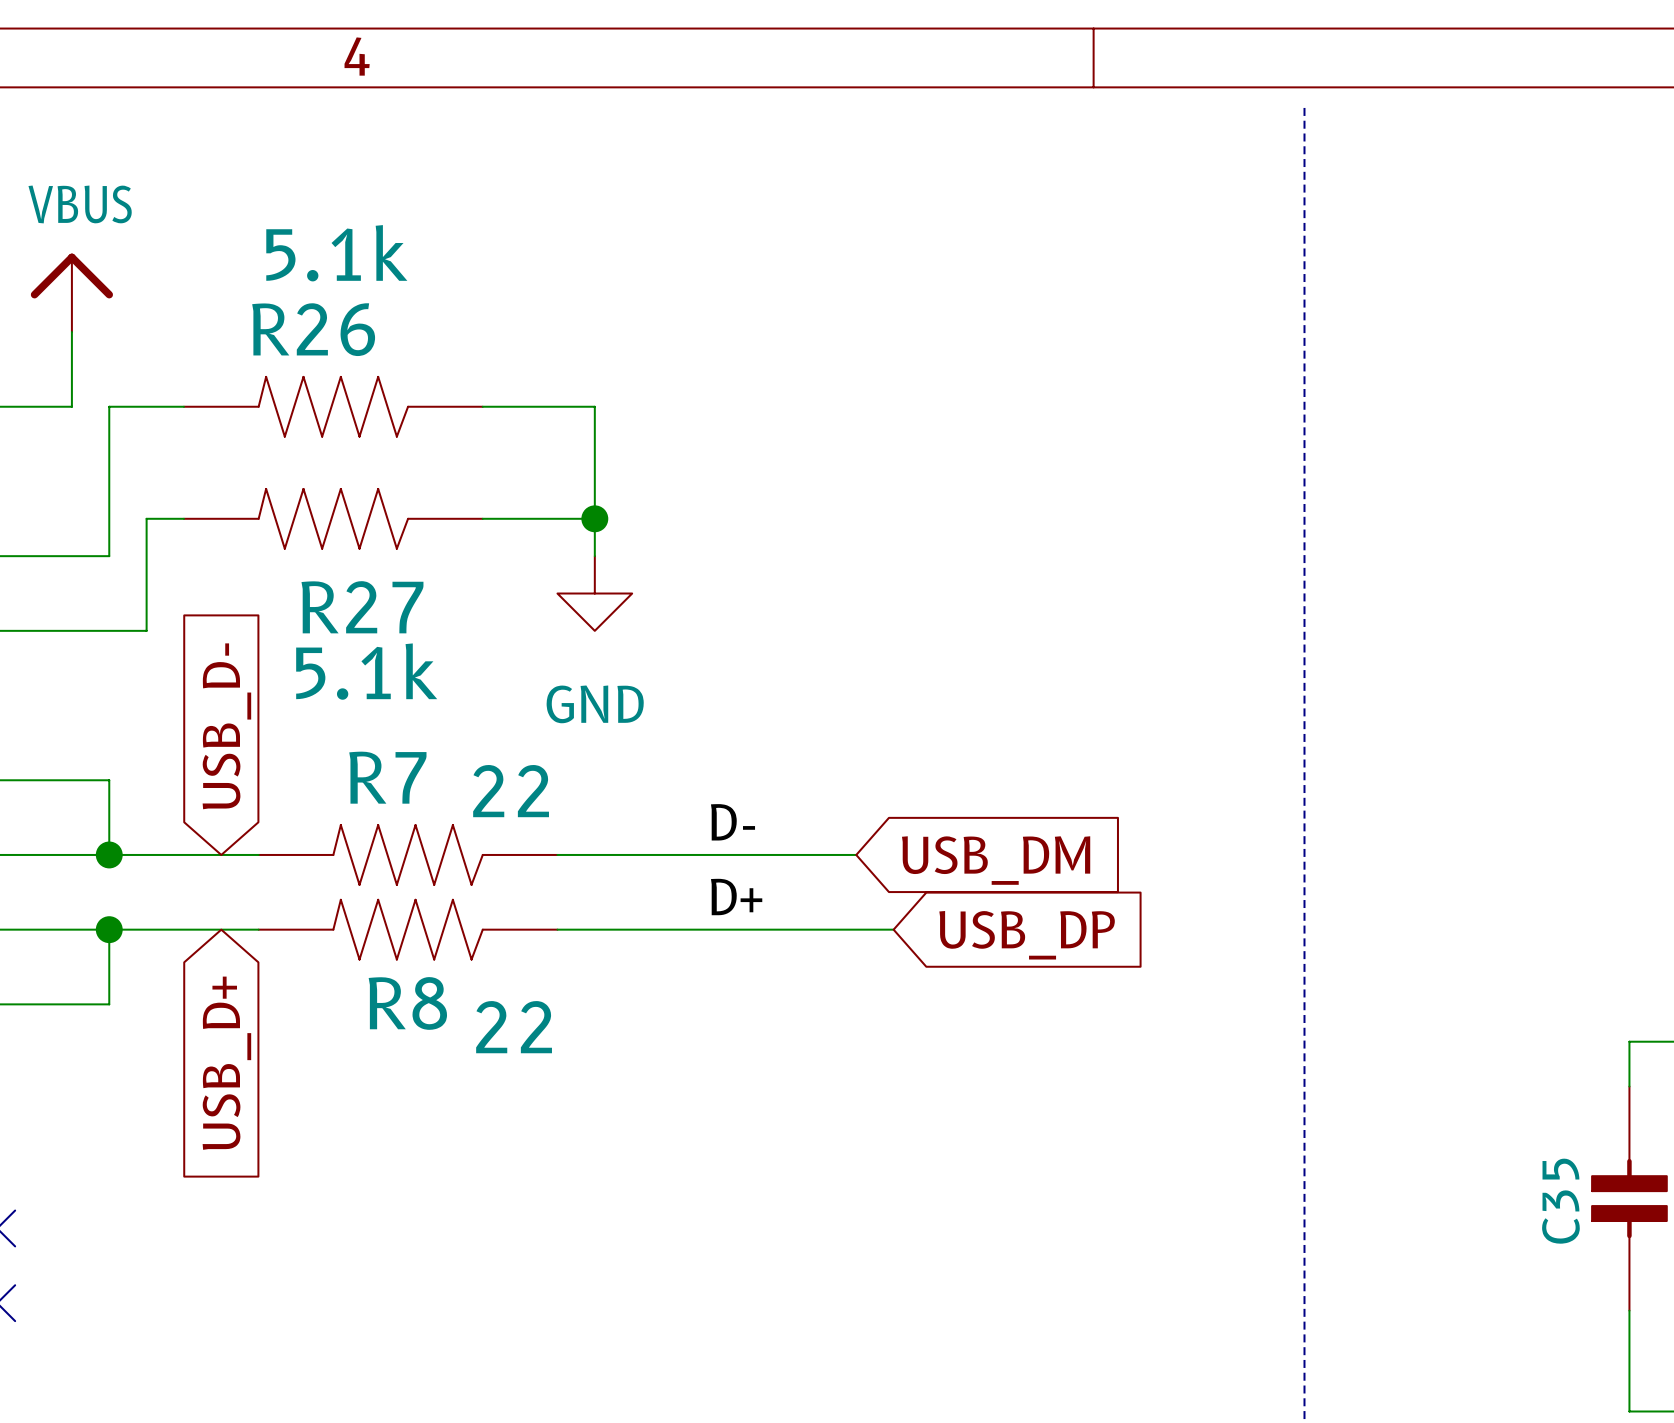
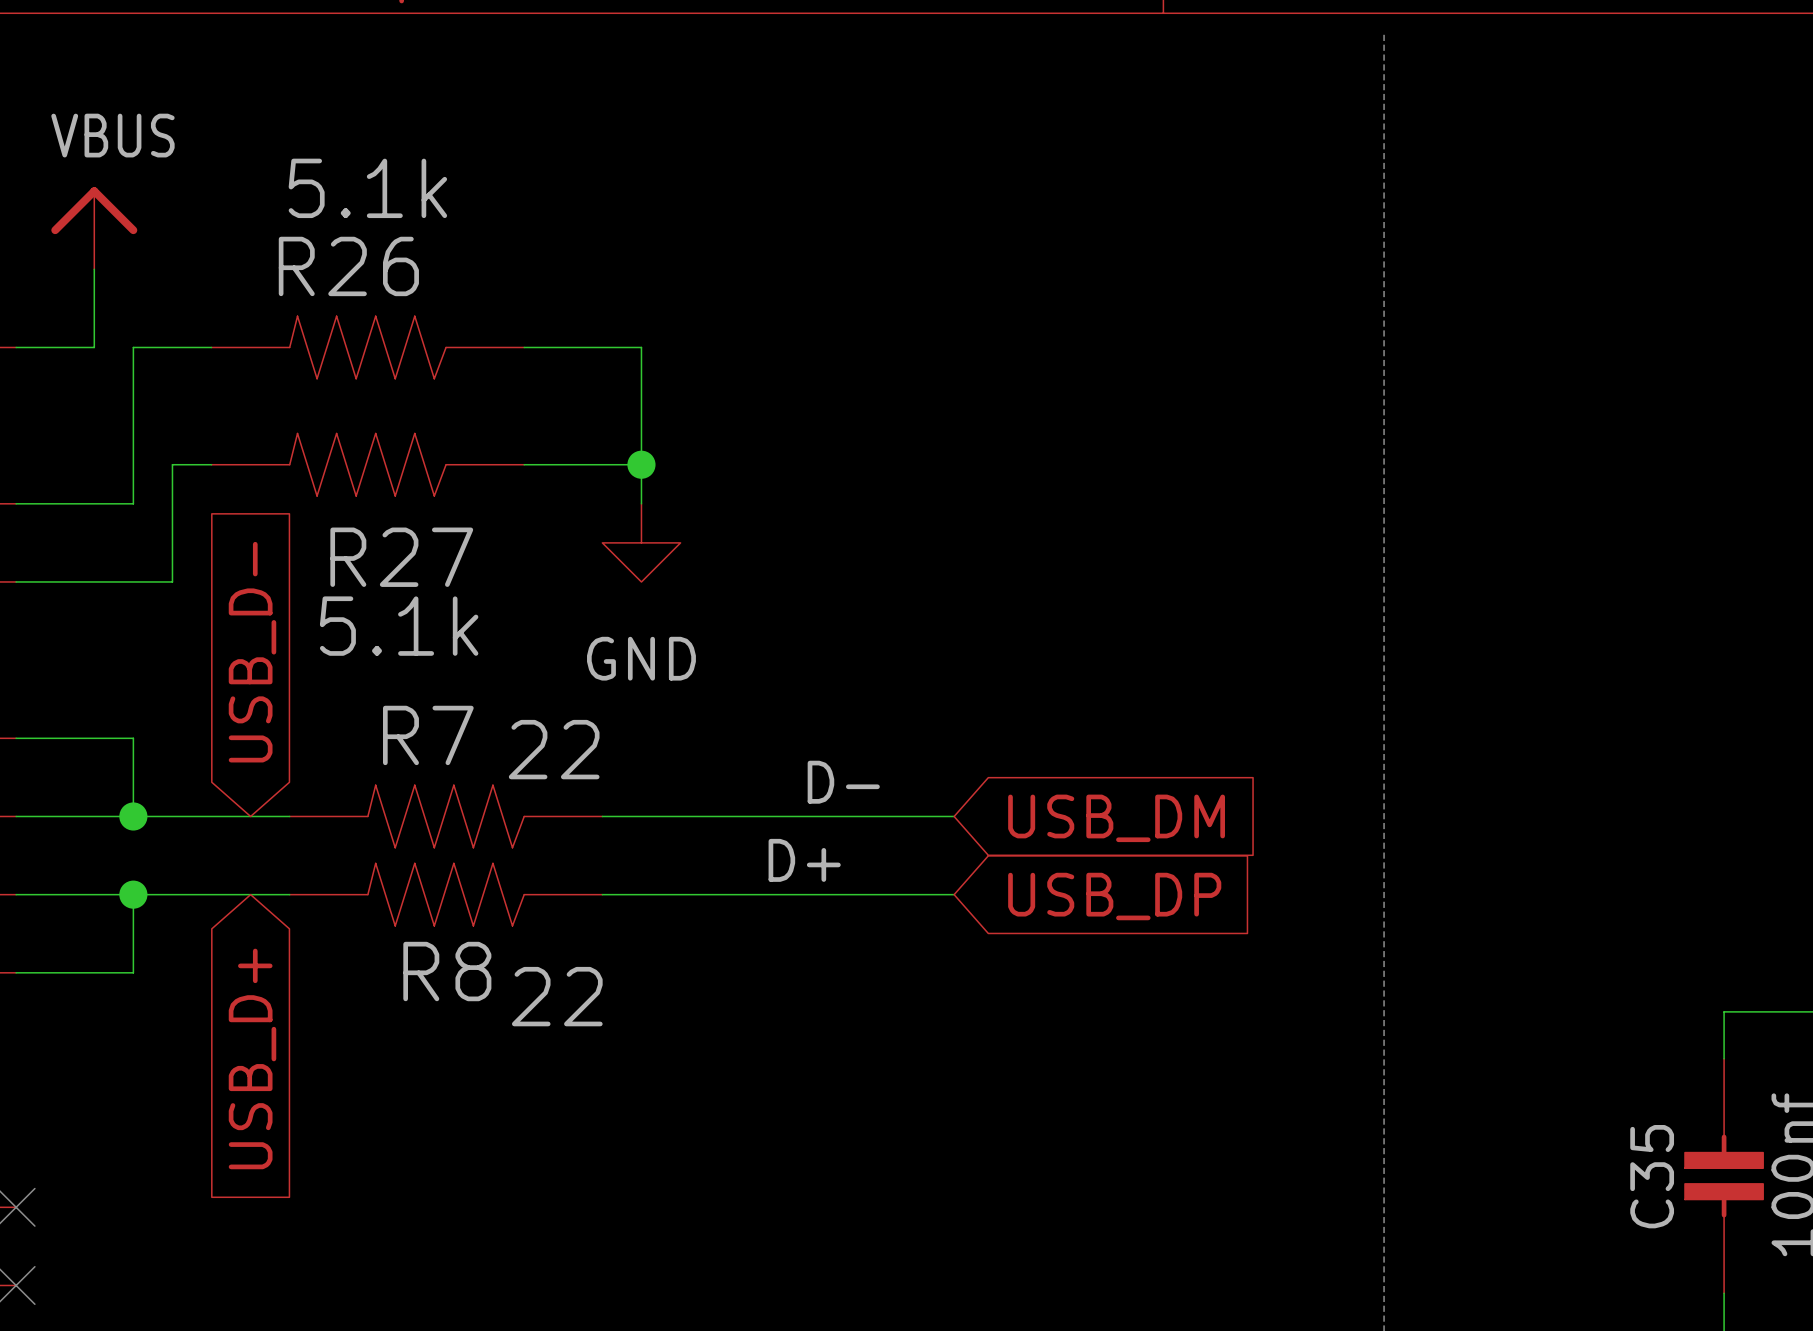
label position: D- (733, 822) -> D- (843, 782)
wire: none -> (915, 816) (954, 816)
global label position: USB_DM (996, 860) -> USB_DM (1116, 818)

